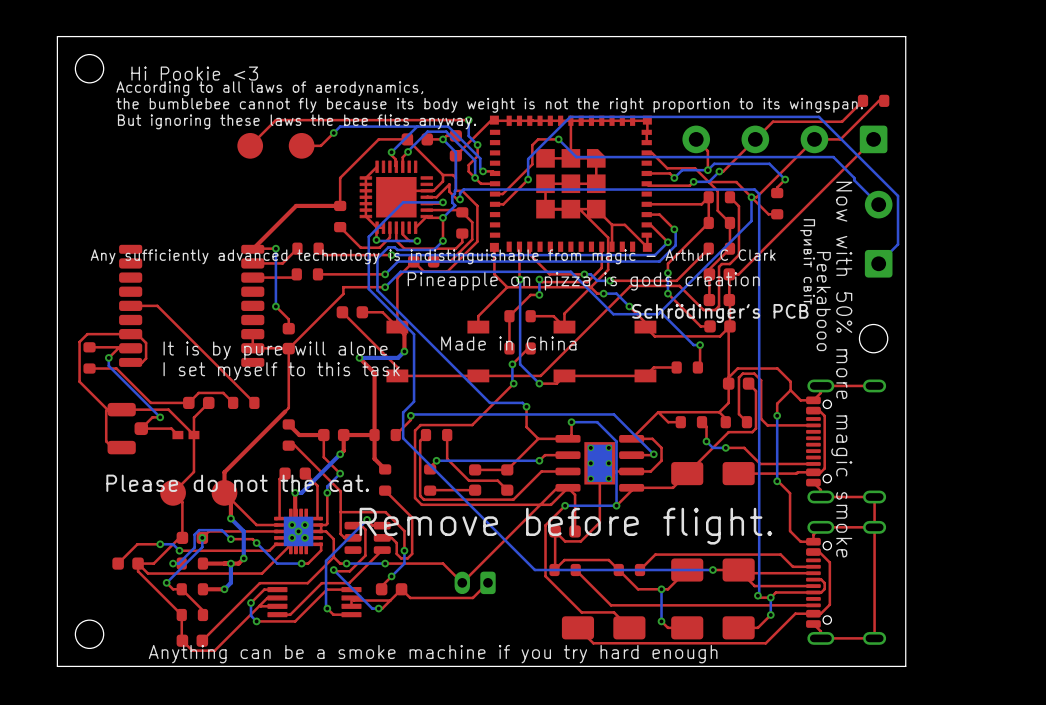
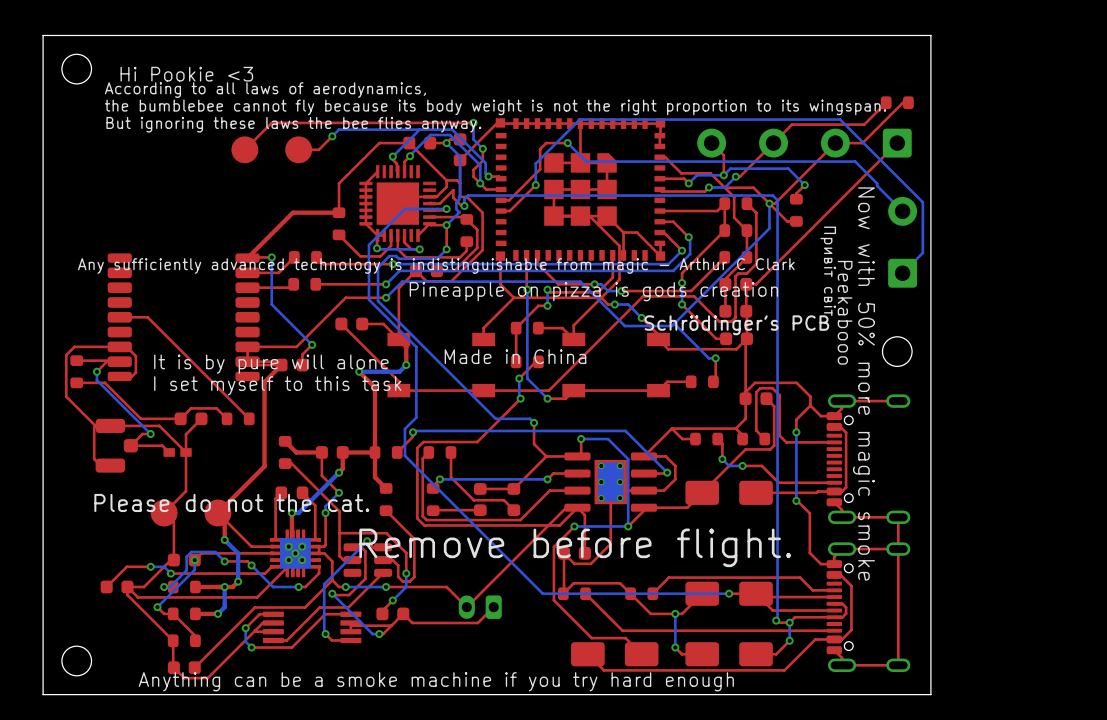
top track: (346, 287) (343, 287) (343, 293) (288, 348) (288, 408) (224, 472) (224, 492) -> (250, 365) (281, 365) (264, 382) (264, 466) (217, 513)
top track: none -> (345, 297) (296, 346) (247, 346)
bottom track: (275, 293) (275, 306) -> (271, 304) (312, 344)
top track: (275, 306) (288, 319) (288, 328) -> none
via position: (275, 306) -> (312, 344)
top track: none -> (312, 344) (302, 354) (302, 365)
part rotation: 0° (288, 338) -> 90° clockwise (291, 365)

